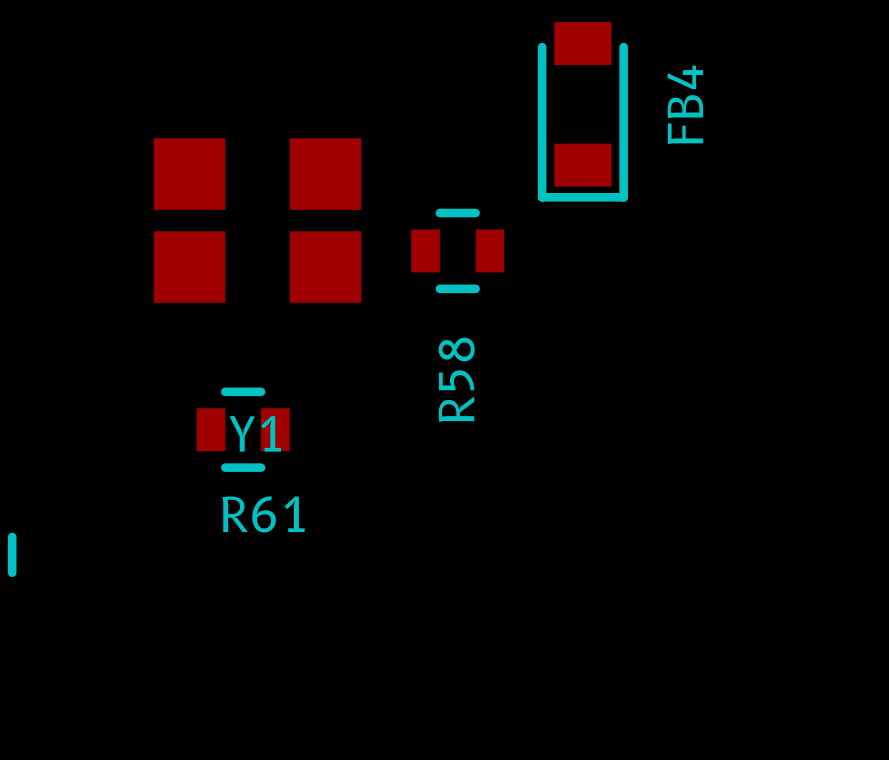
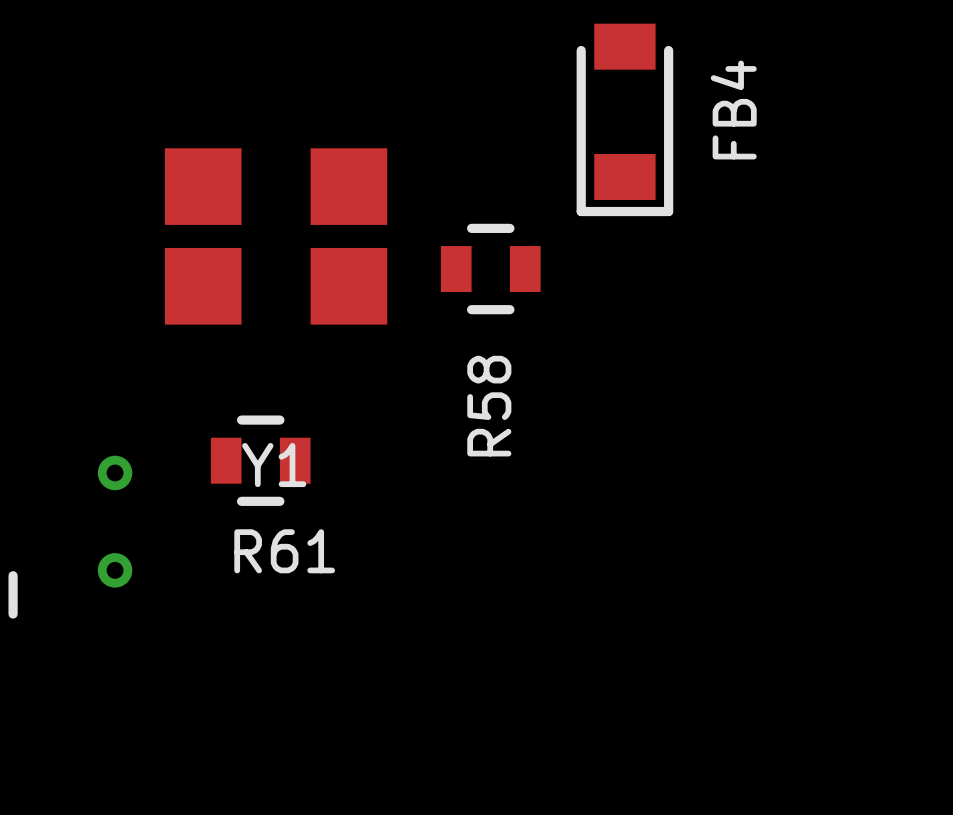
via: none -> (115, 472)
via: none -> (115, 570)

